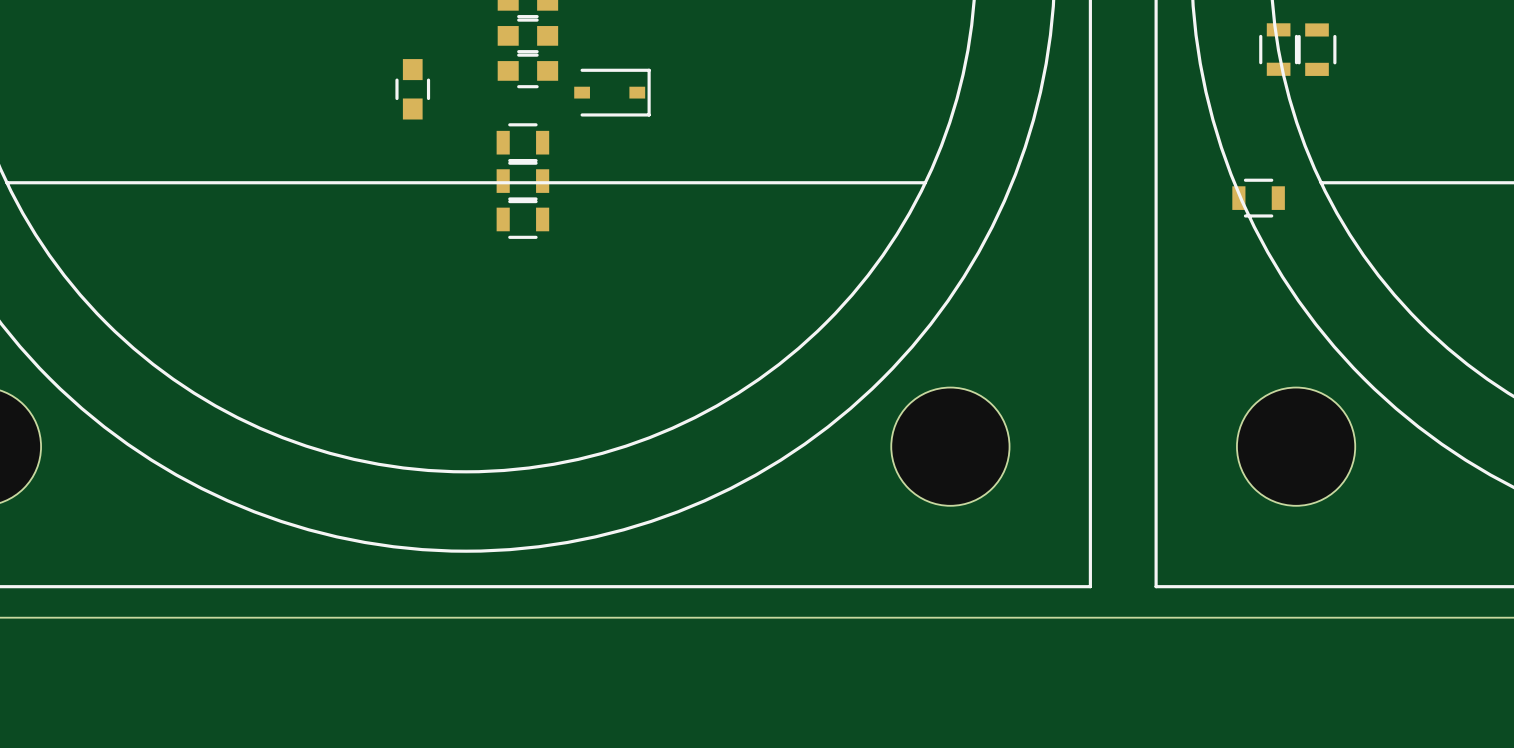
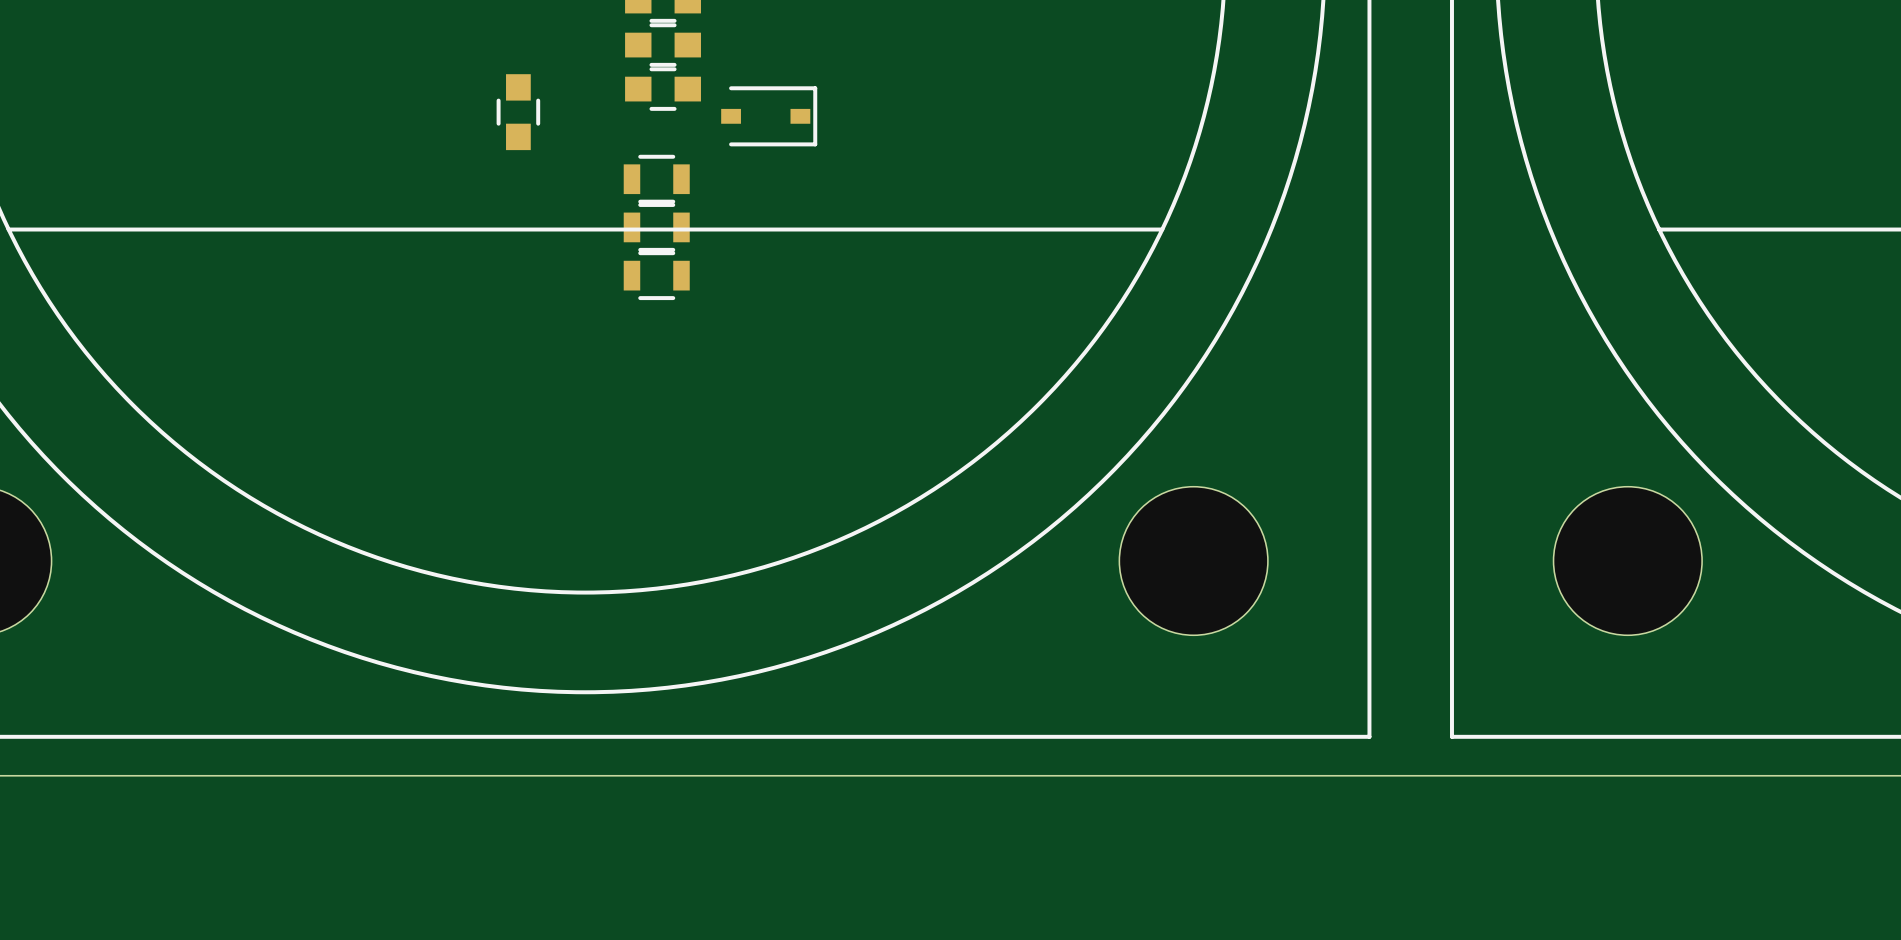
part: (1278, 49) -> none
part: (1317, 49) -> none
part: (1258, 198) -> none

